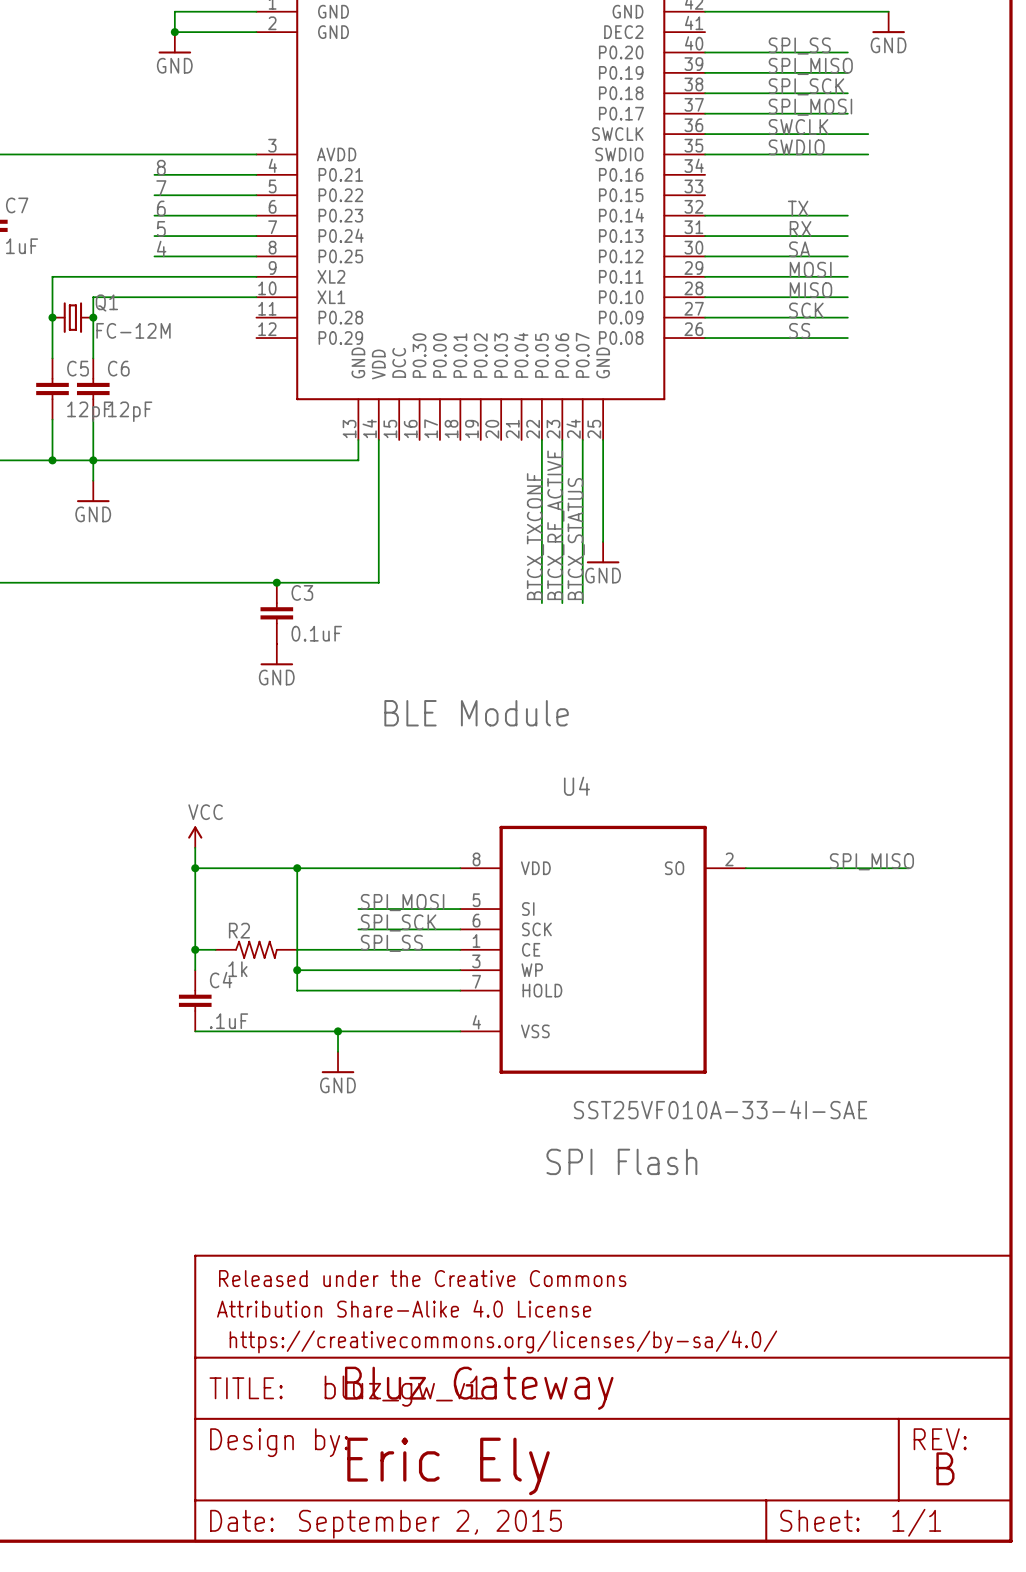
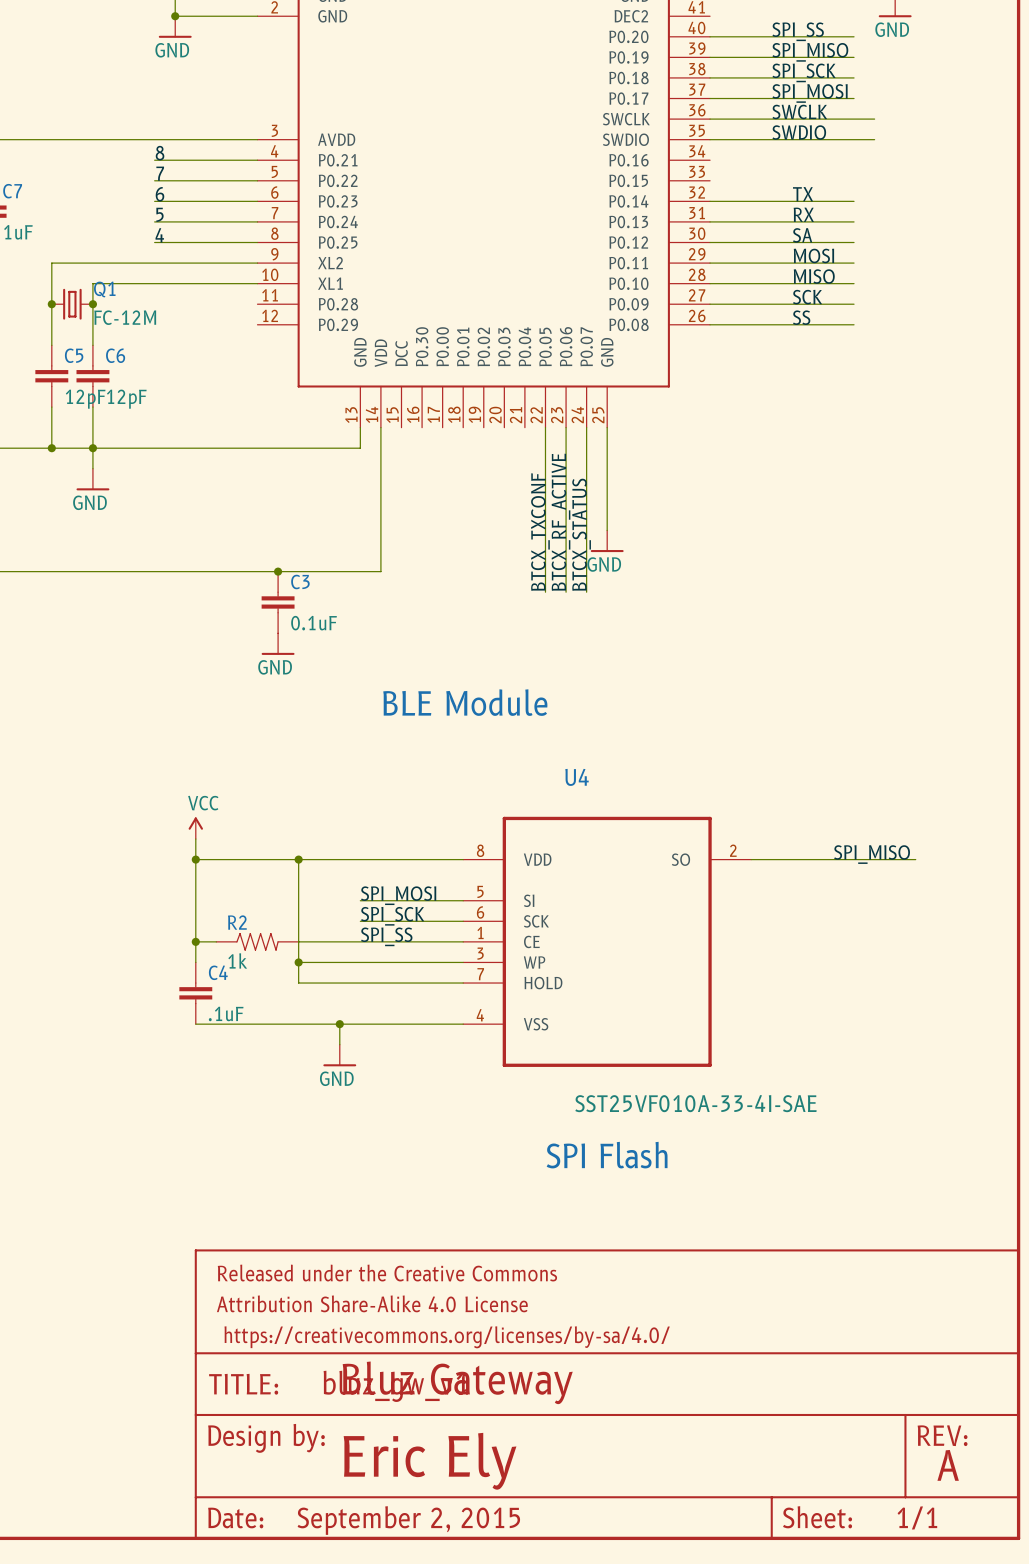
text: B (945, 1468) -> A (948, 1465)

